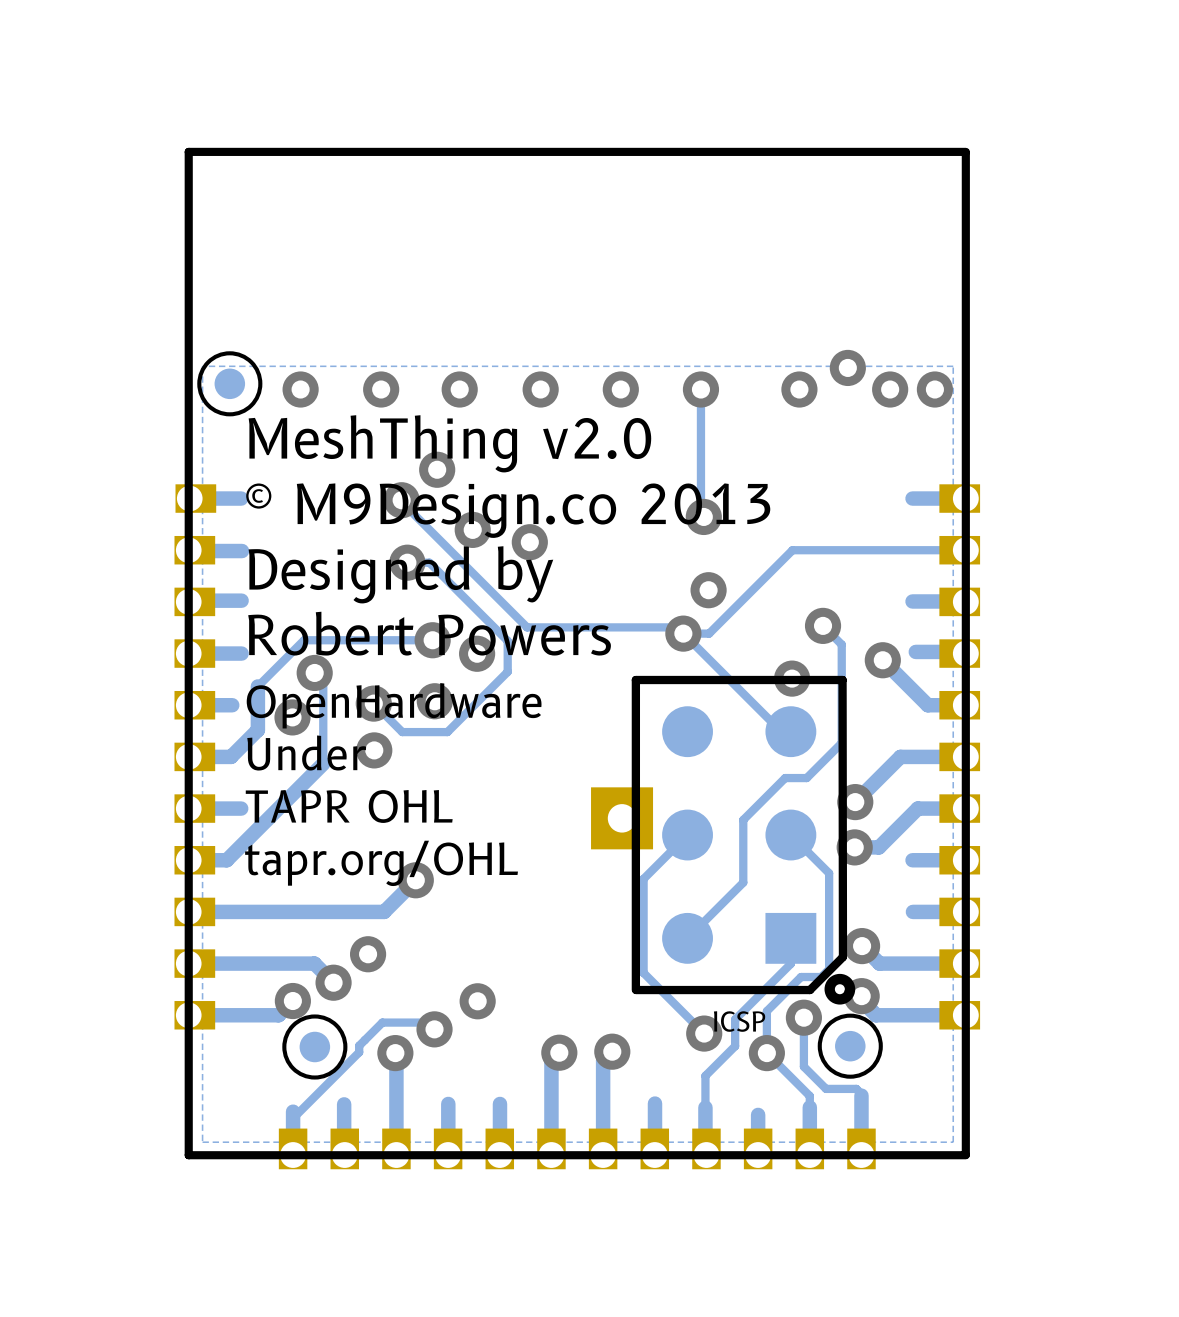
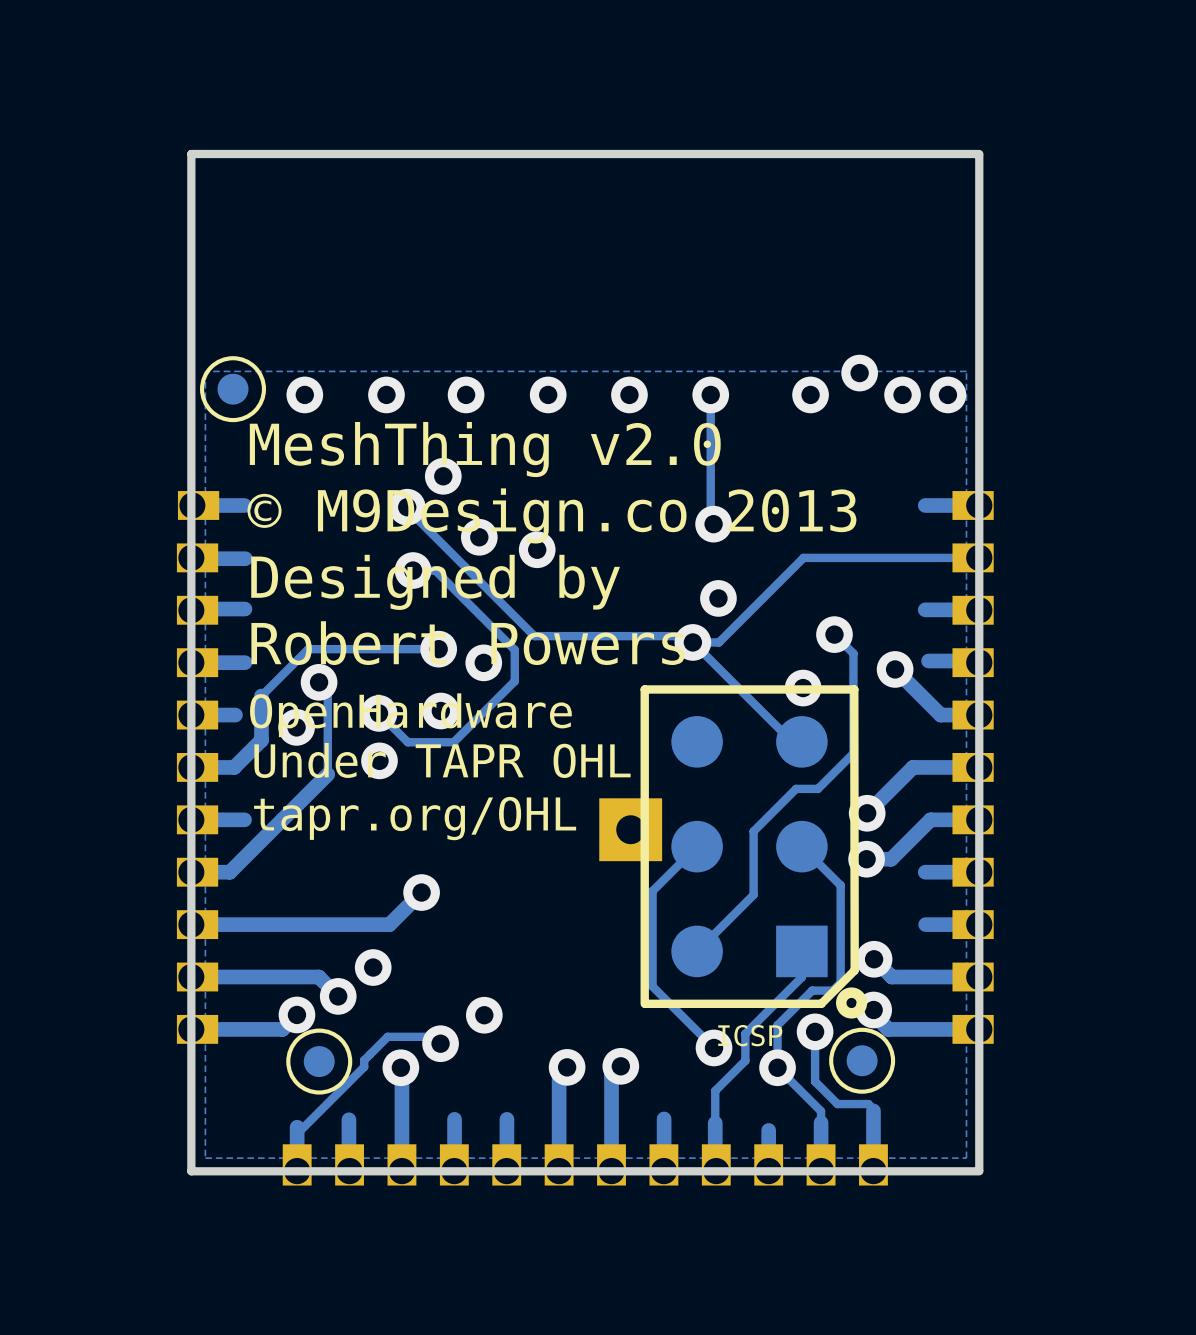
text: Under (306, 753) -> Under TAPR OHL (442, 760)
text: TAPR OHL (349, 806) -> none
text position: tapr.org/OHL (381, 863) -> tapr.org/OHL (415, 818)

